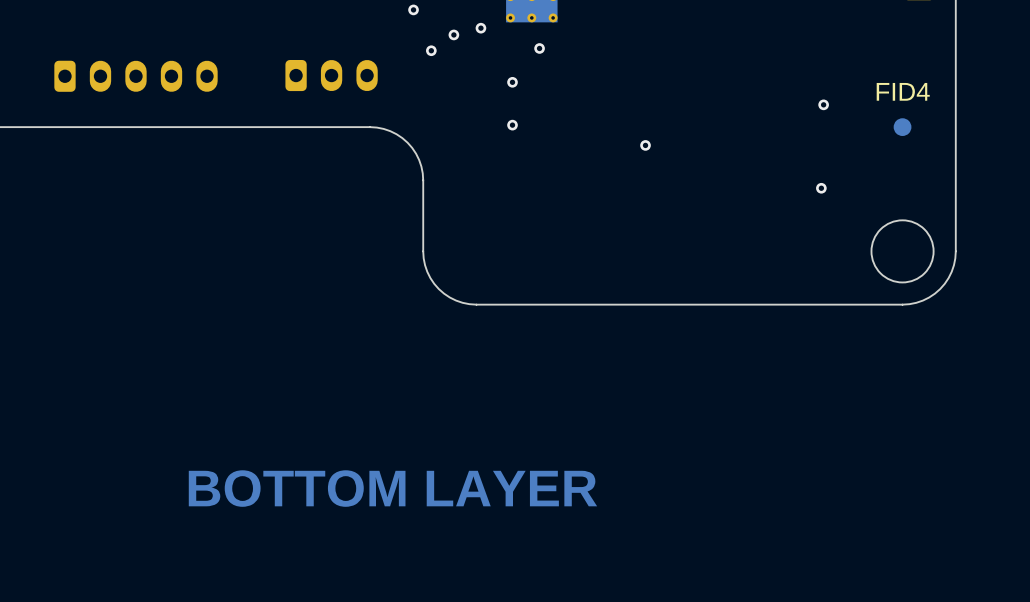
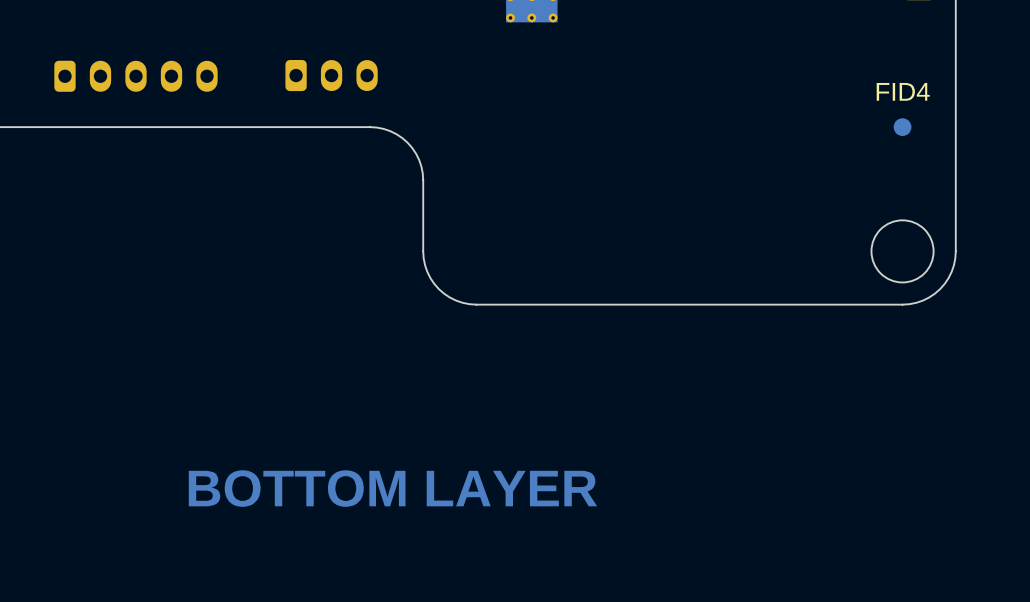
via: (413, 9) -> none
via: (480, 28) -> none
via: (453, 34) -> none
via: (539, 48) -> none
via: (431, 50) -> none
via: (512, 82) -> none
via: (823, 104) -> none
via: (512, 125) -> none
via: (645, 145) -> none
via: (821, 188) -> none

